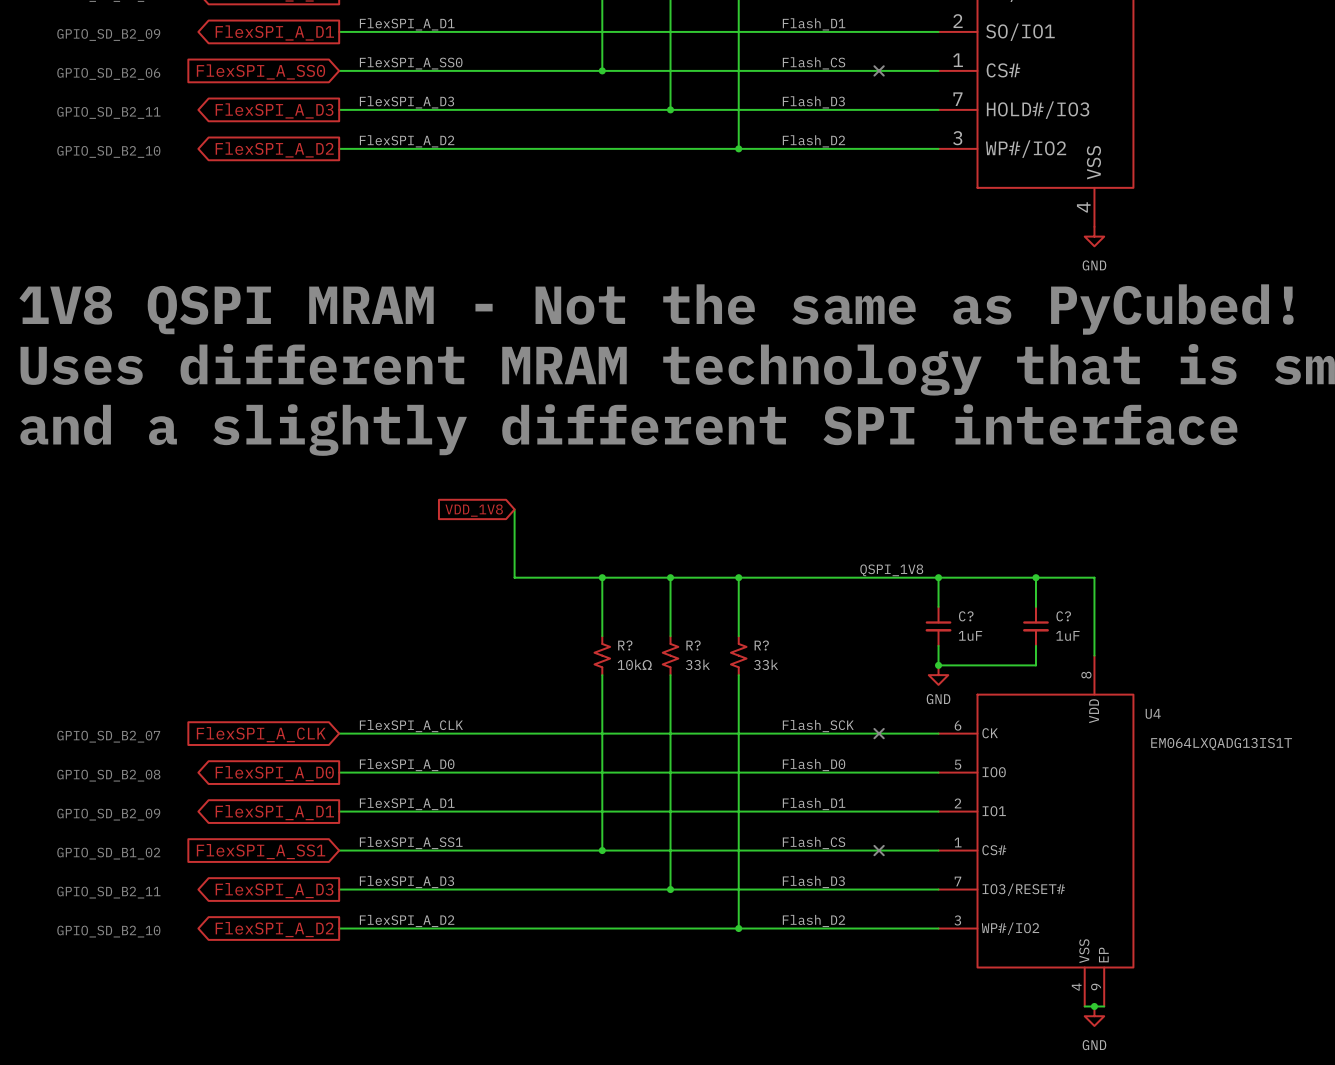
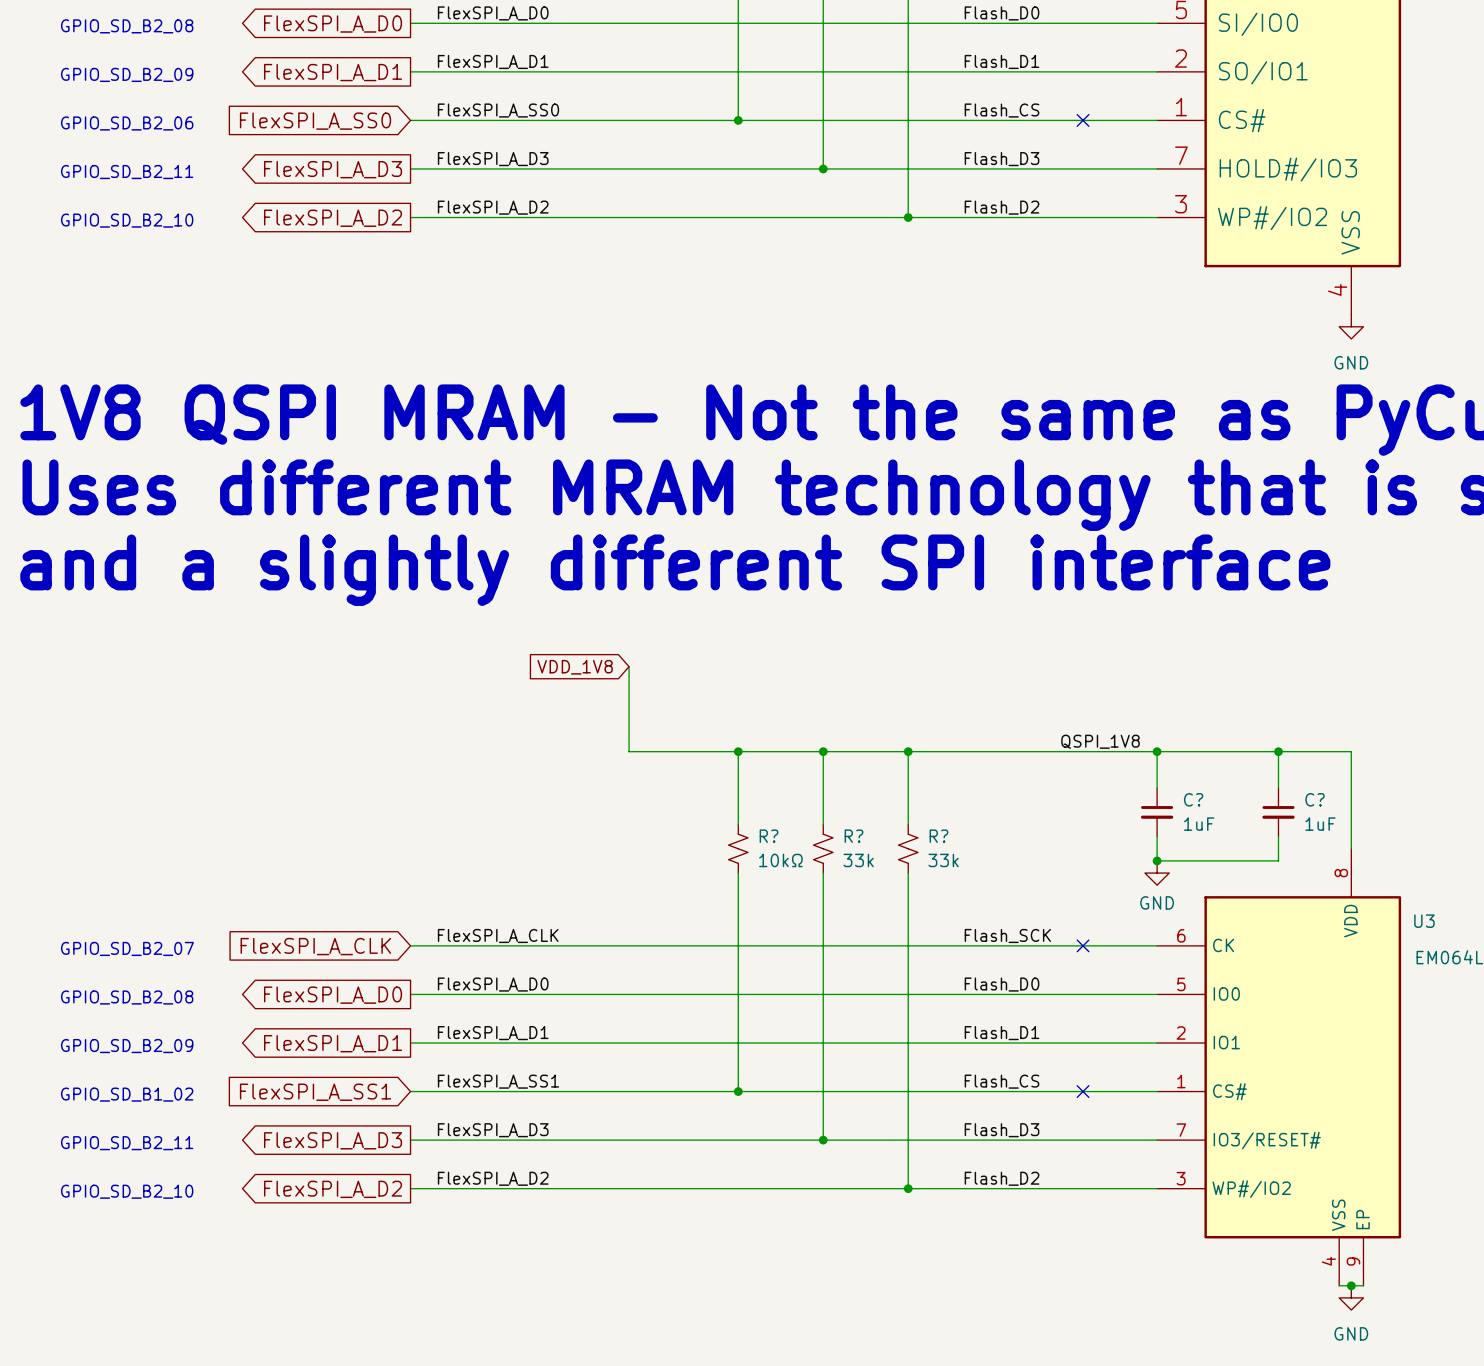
U4 name: U4 (1153, 713) -> U3 (1424, 921)

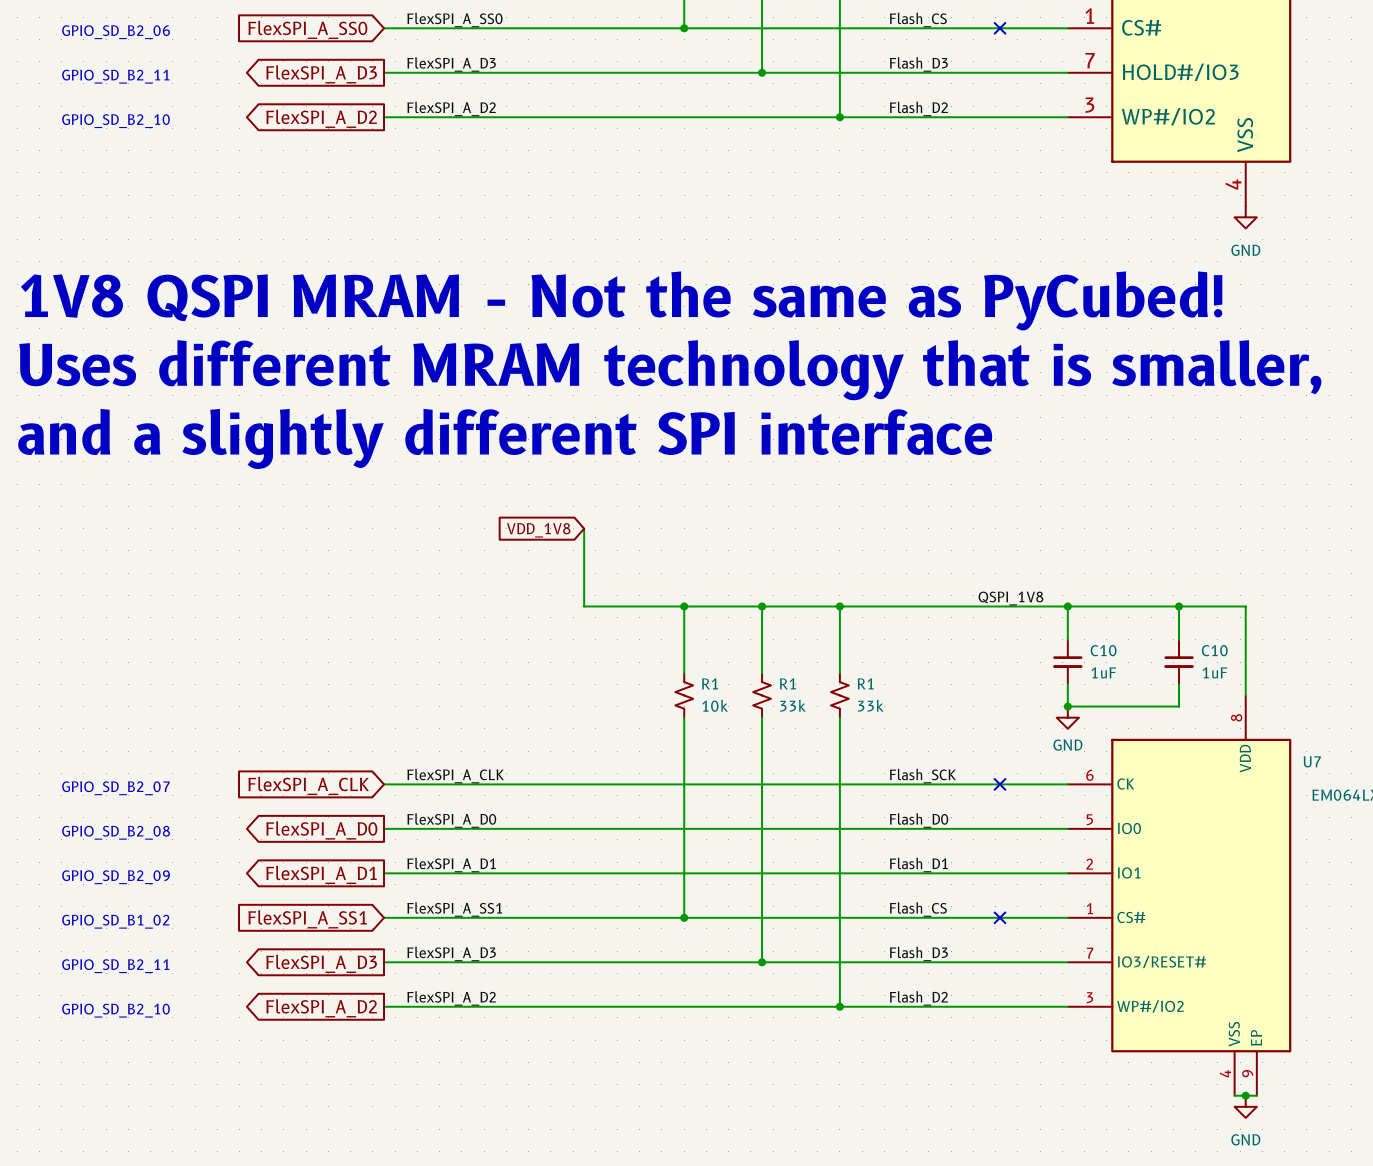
C? name: C? (1193, 799) -> C10 (1103, 650)
C? name: C? (1315, 799) -> C10 (1214, 650)
R? name: R? (769, 836) -> R1 (710, 683)
R? name: R? (854, 836) -> R1 (787, 683)
R? name: R? (938, 836) -> R1 (865, 683)
R? value: 10kΩ (780, 860) -> 10k (715, 705)
U3 name: U3 (1424, 921) -> U7 (1312, 761)

